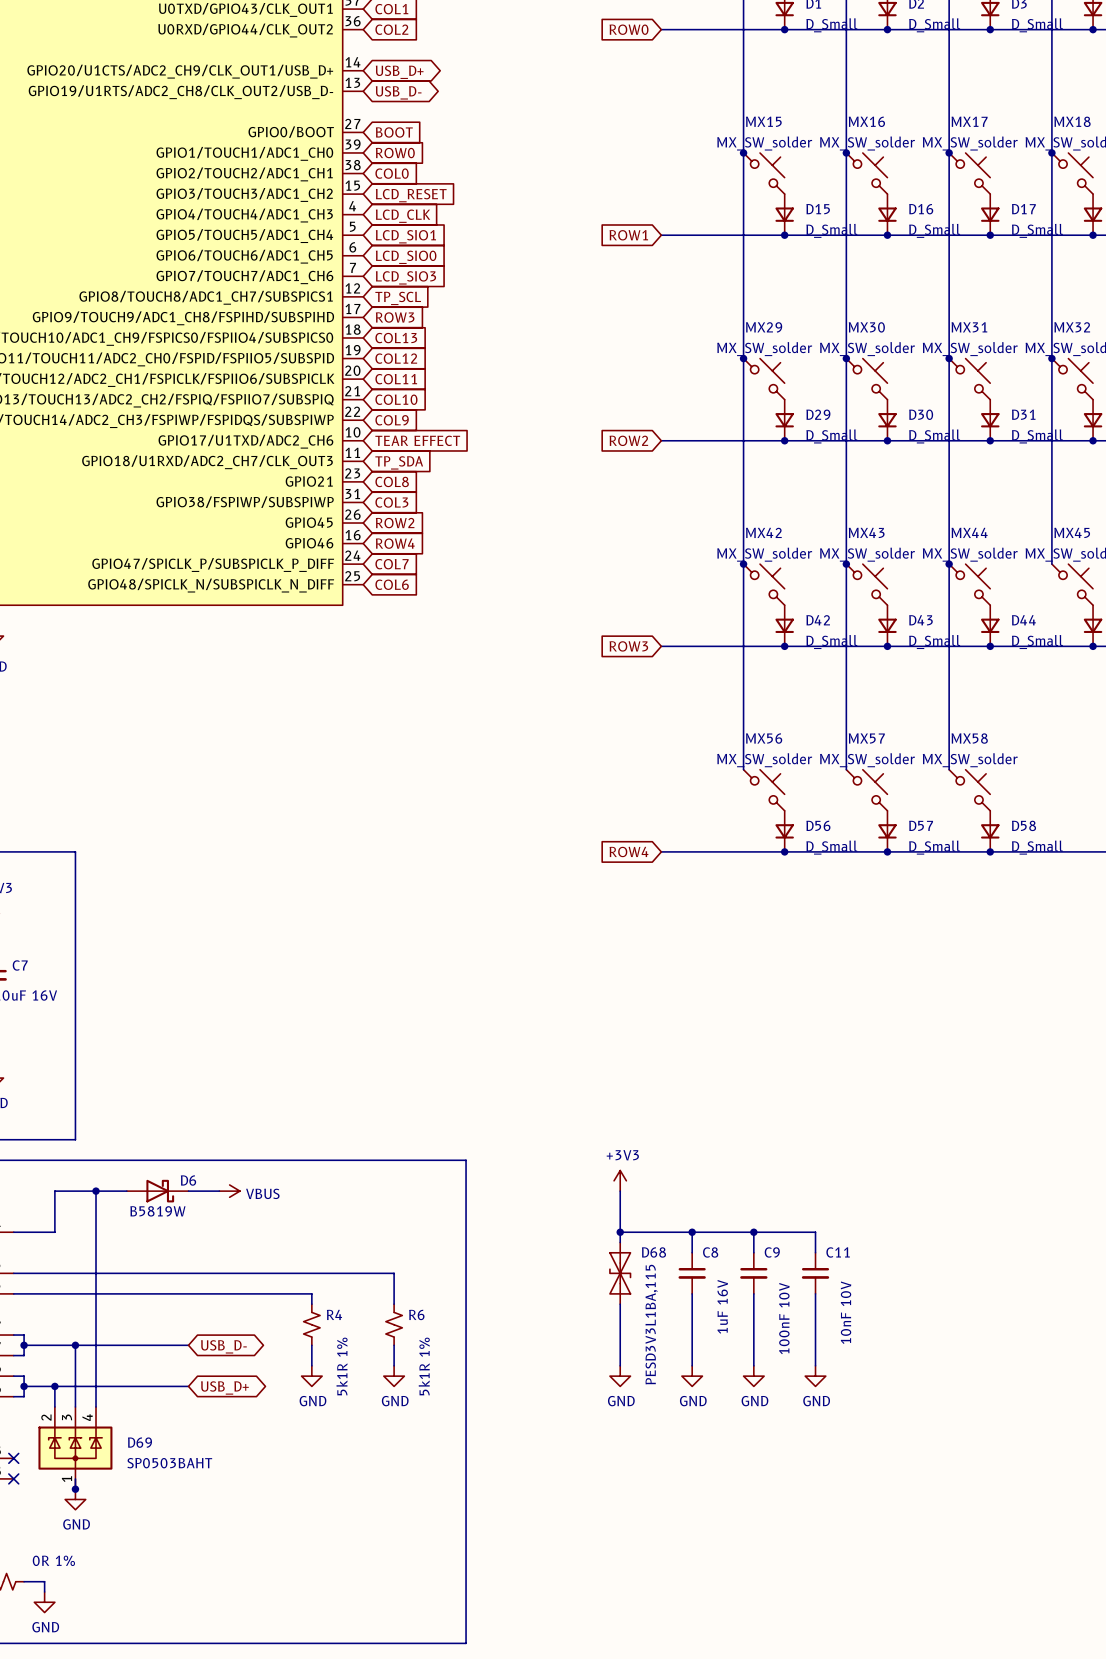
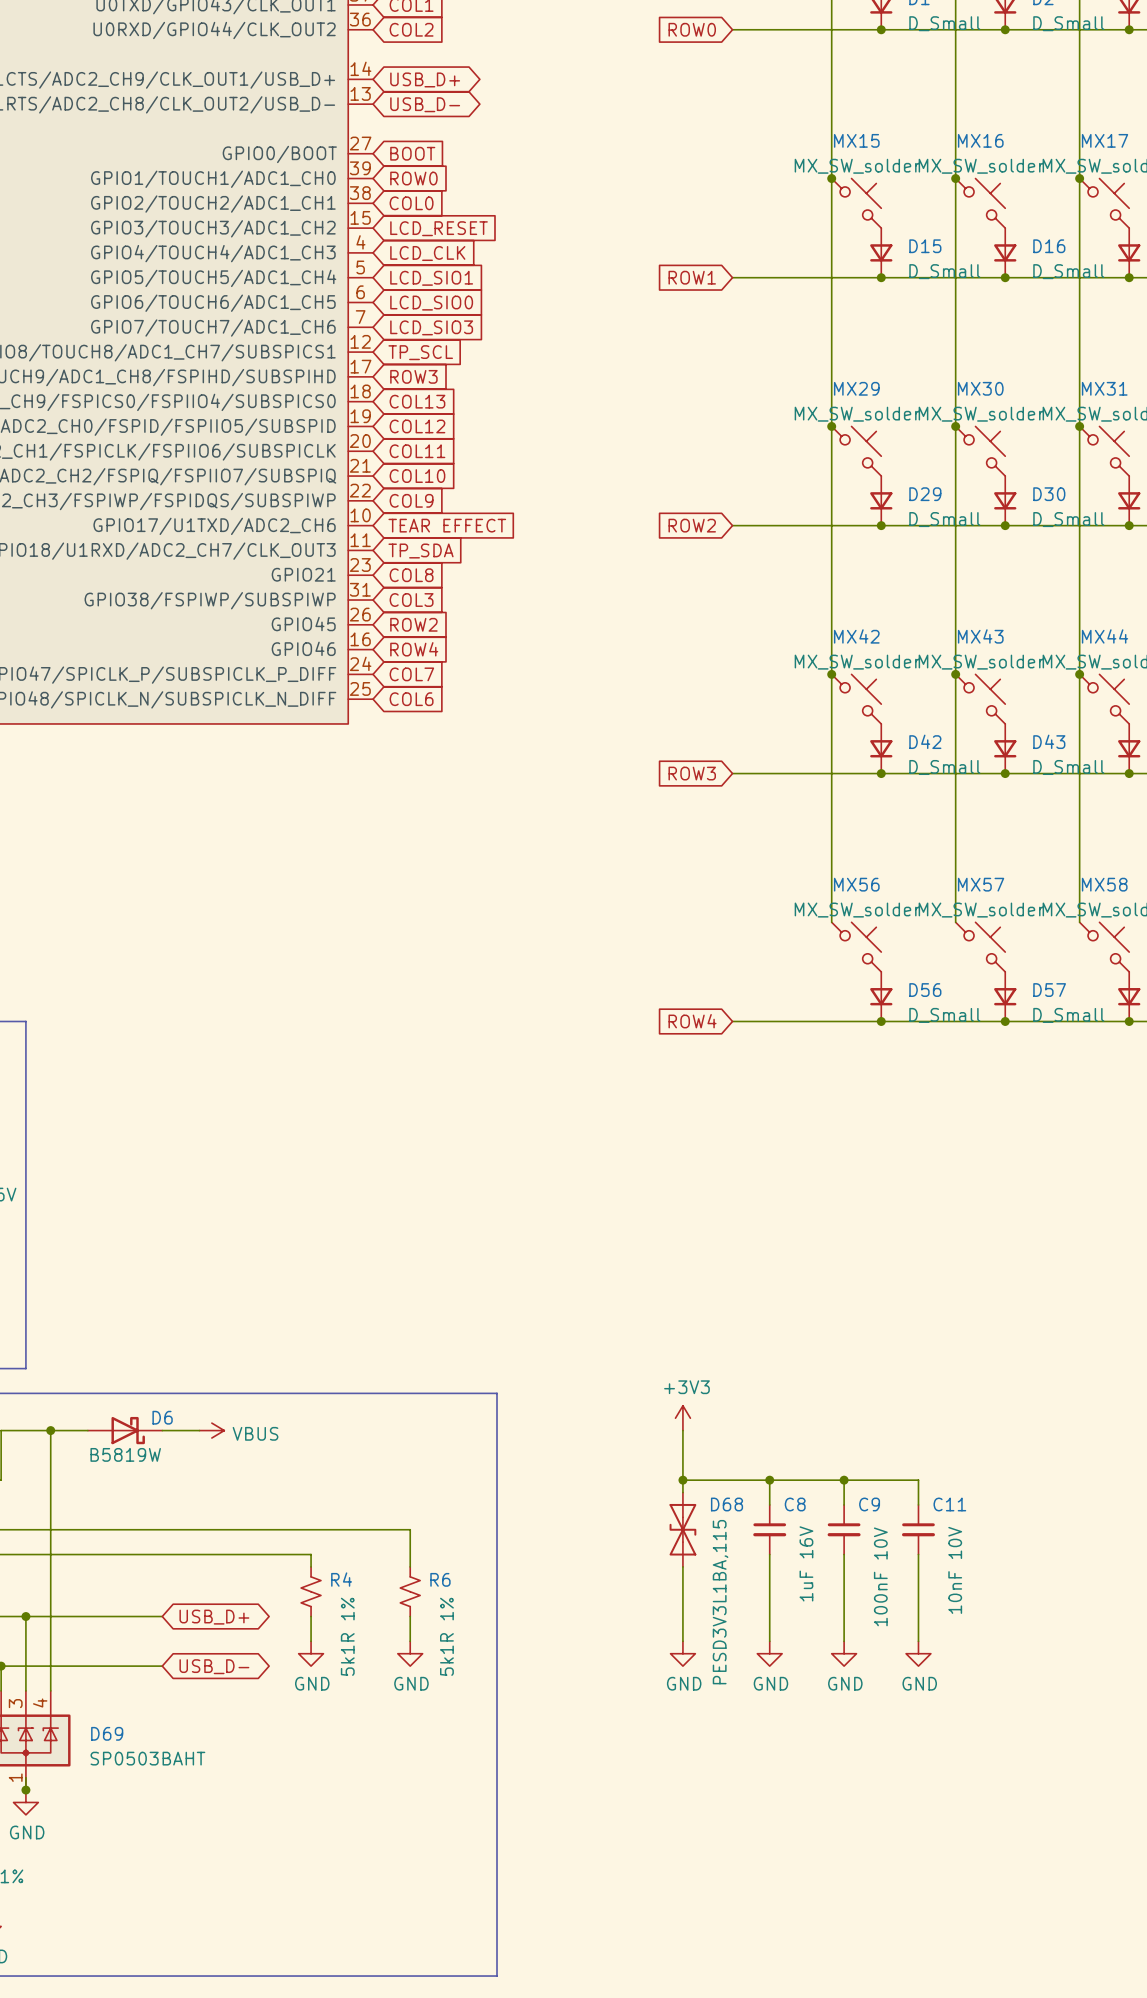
global label: USB_D- (223, 1346) -> USB_D+ (214, 1617)
global label: USB_D+ (224, 1387) -> USB_D- (214, 1666)

